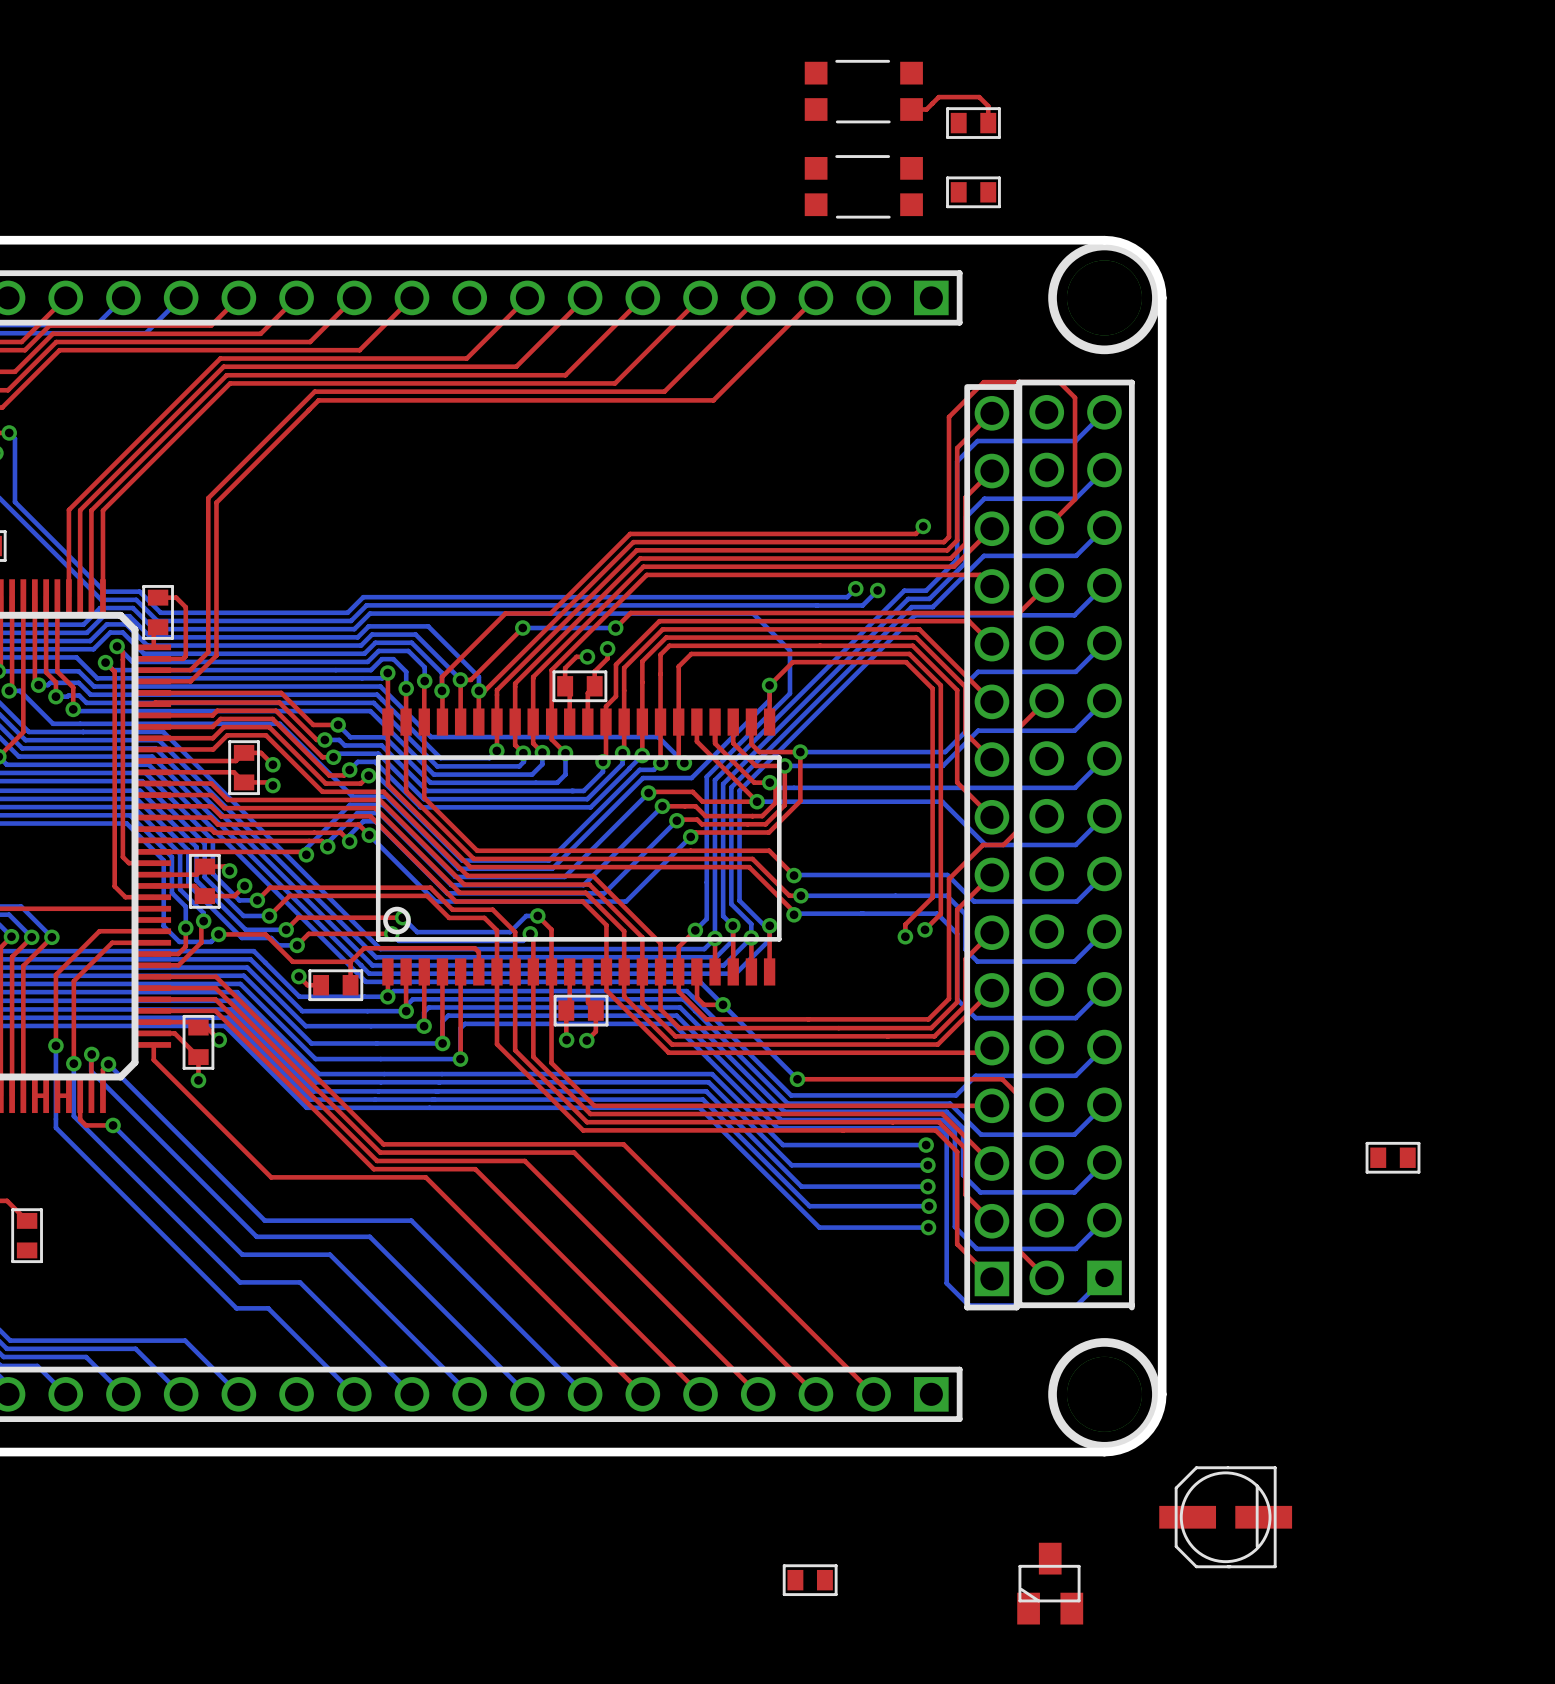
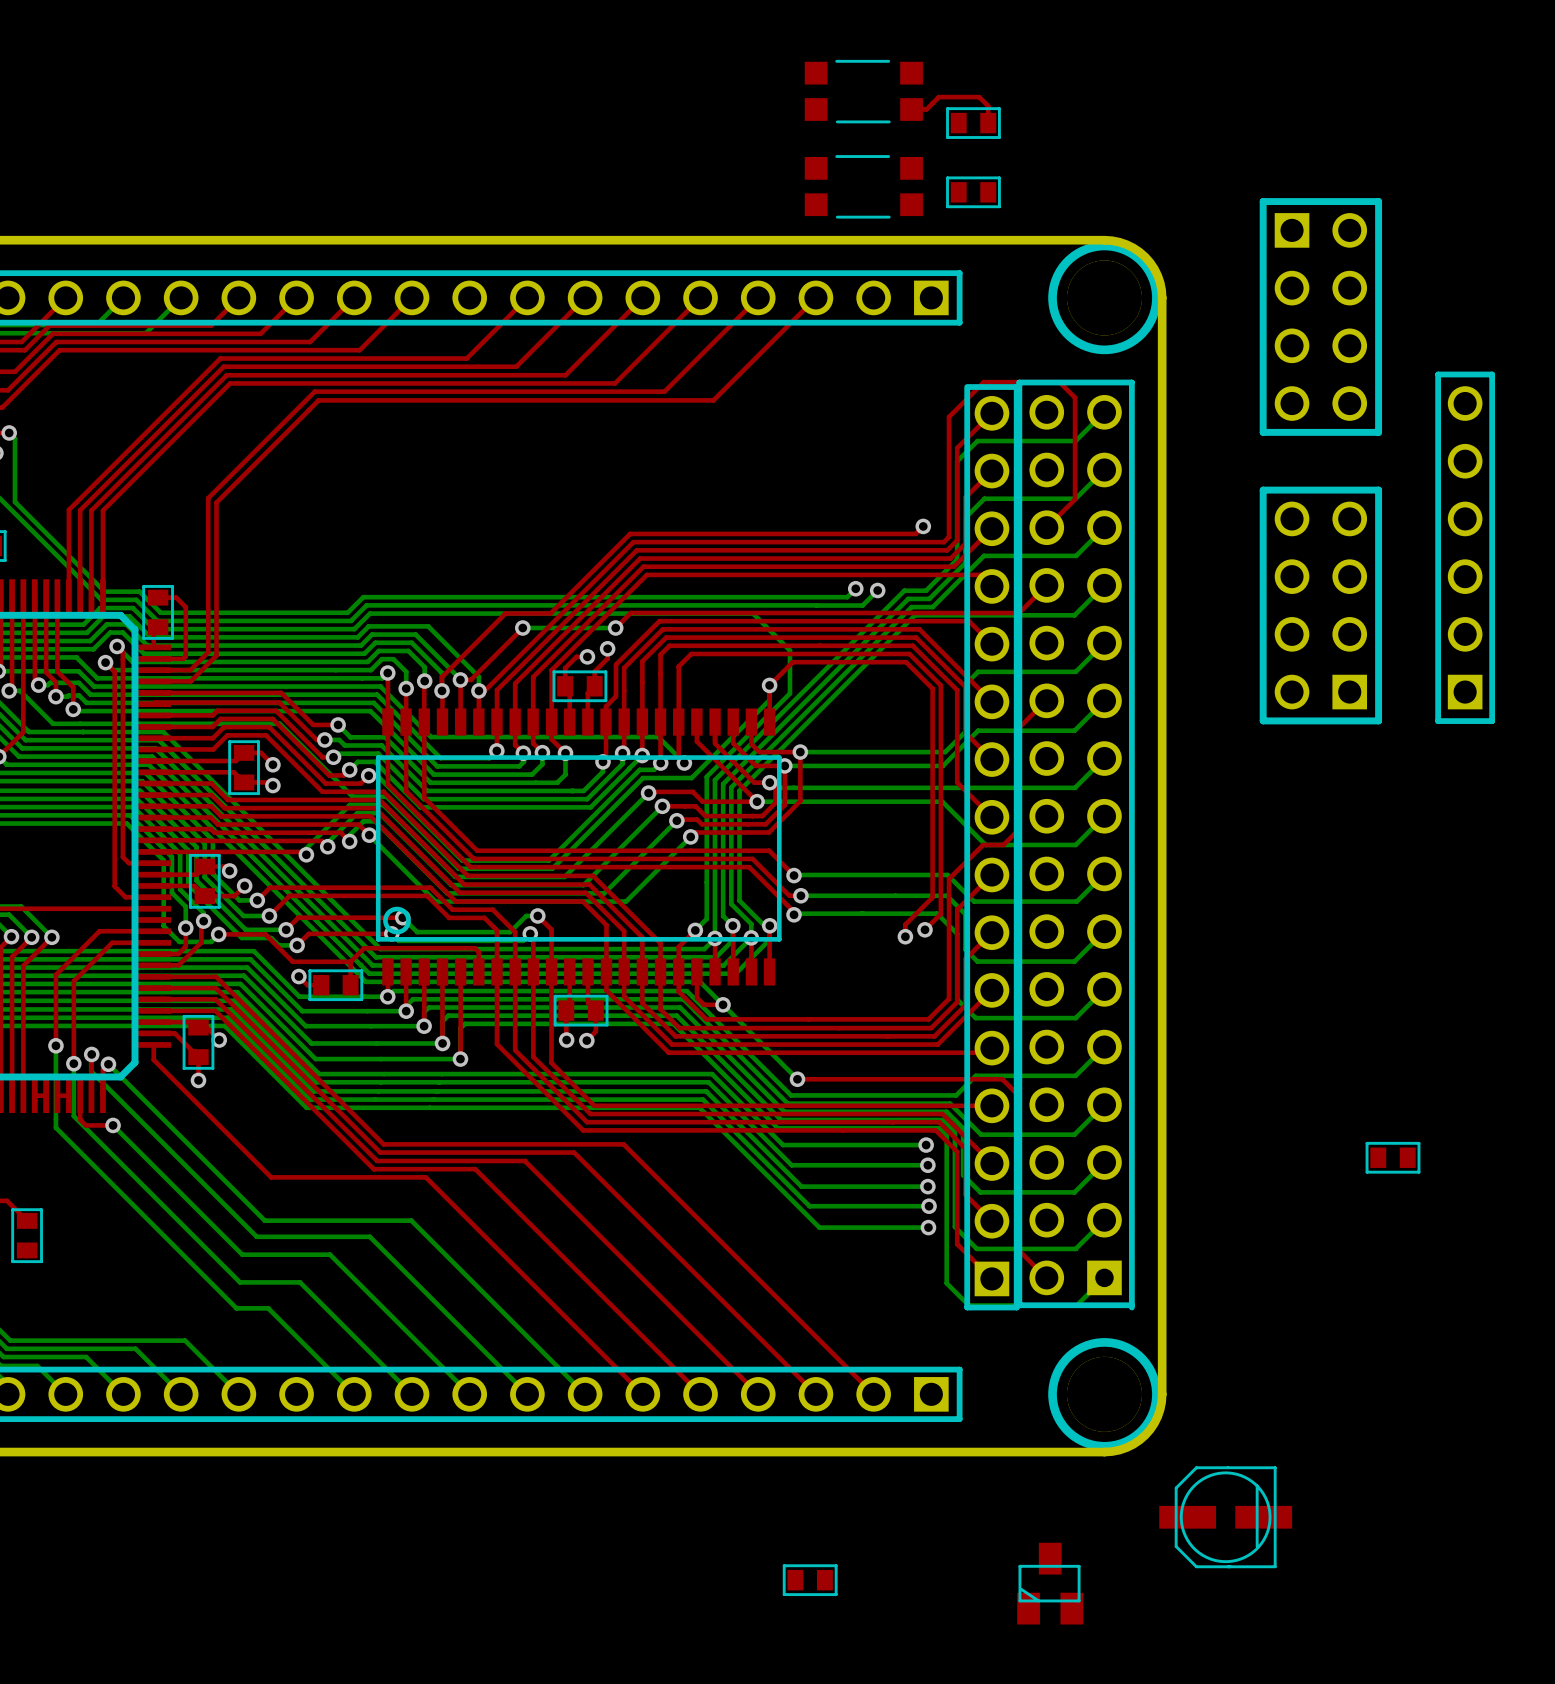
part: none -> (1320, 316)
part: none -> (1465, 547)
part: none -> (1320, 605)

